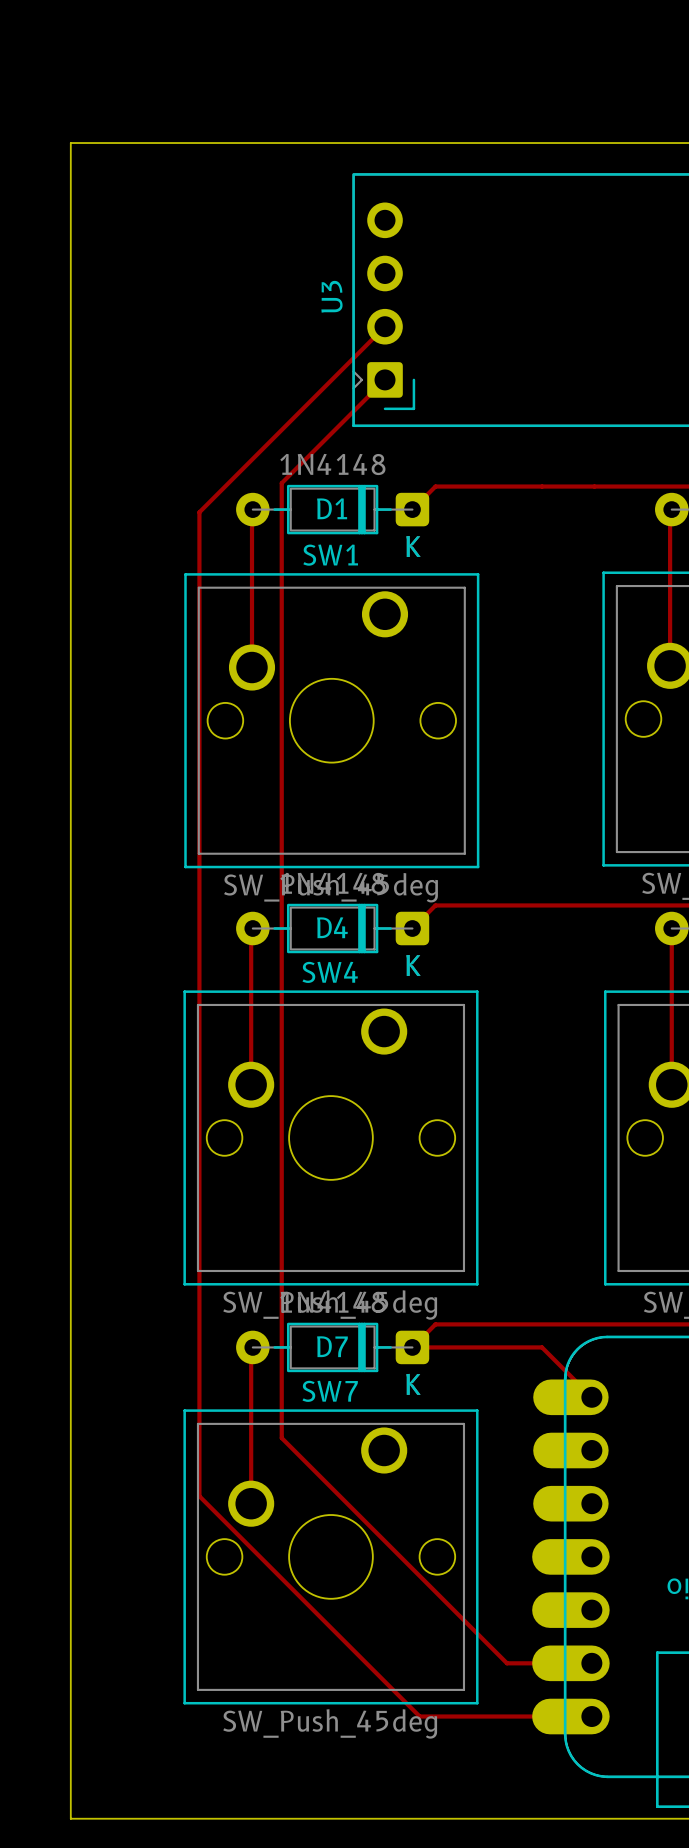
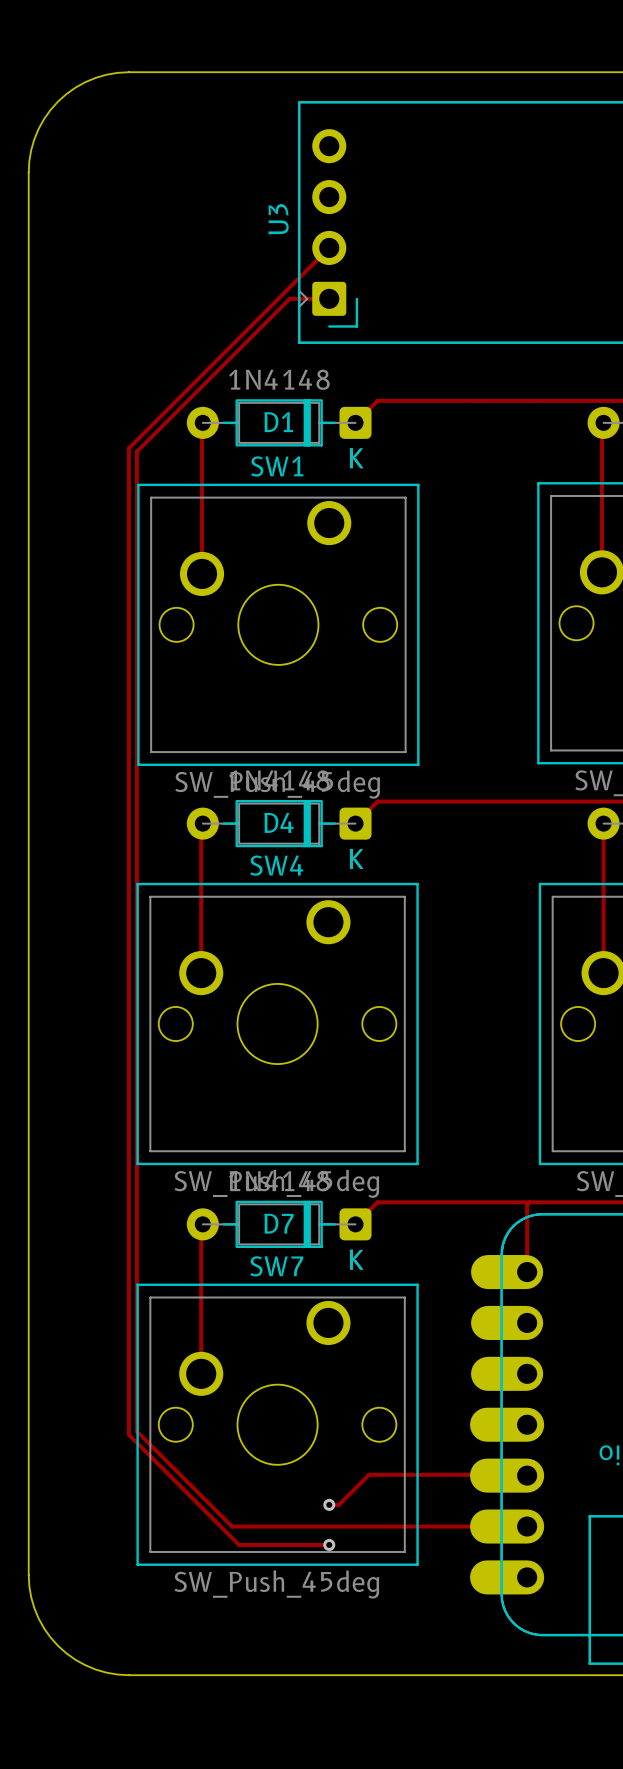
board edge: (175, 143) (70, 143) (70, 247) -> (128, 72) (95, 77) (75, 87) (58, 101) (44, 119) (34, 139) (28, 172)
track: (385, 379) (281, 483) (281, 1438) (506, 1663) -> (329, 298) (289, 298) (136, 451) (136, 1431) (232, 1526) (445, 1526)
track: (199, 512) (199, 1496) (419, 1716) (591, 1716) -> (151, 425) (128, 448) (128, 1434) (239, 1544) (329, 1544)
track: (412, 1347) (542, 1347) (591, 1397) -> (529, 1202) (527, 1204) (527, 1272)
track: none -> (527, 1475) (368, 1474) (338, 1504) (329, 1504)
via: none -> (329, 1504)
via: none -> (329, 1544)
board edge: (70, 1714) (70, 1818) (175, 1818) -> (28, 1575) (34, 1608) (44, 1628) (58, 1645) (75, 1659) (95, 1669) (128, 1675)

